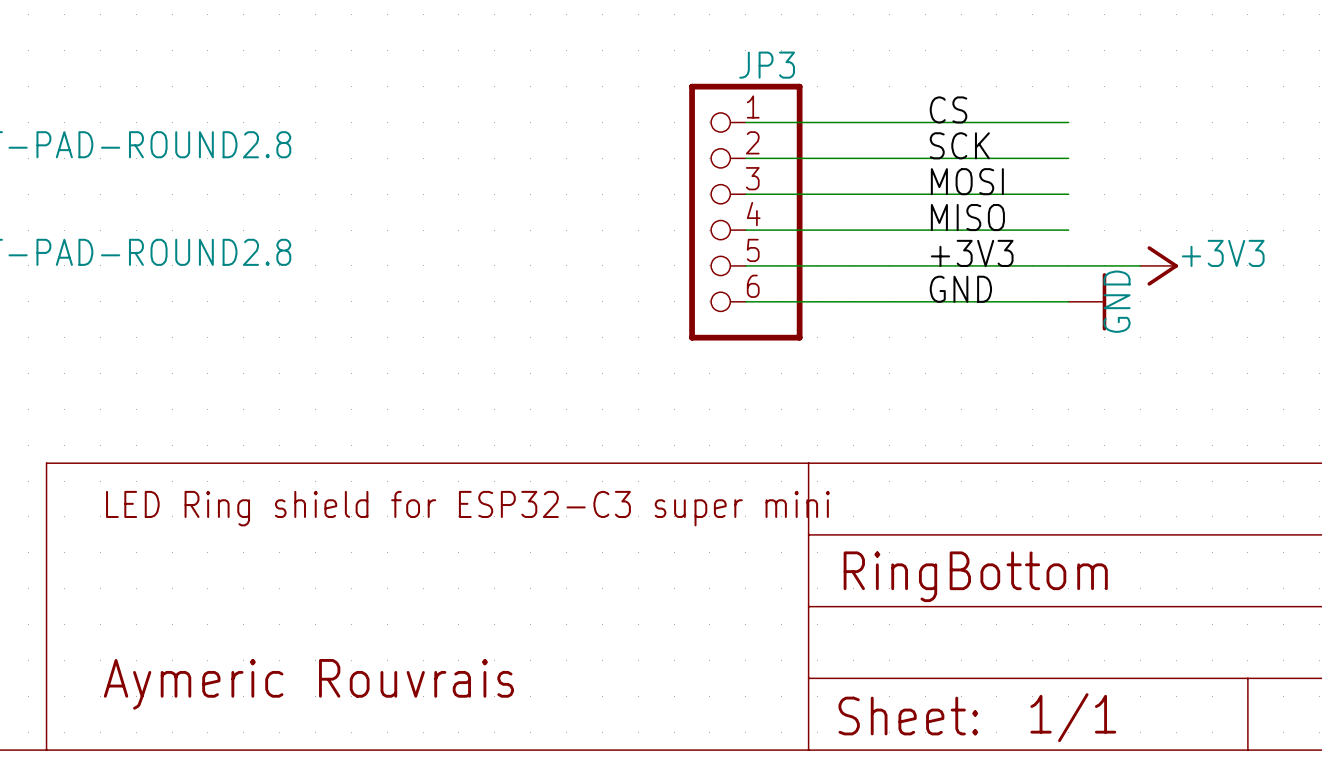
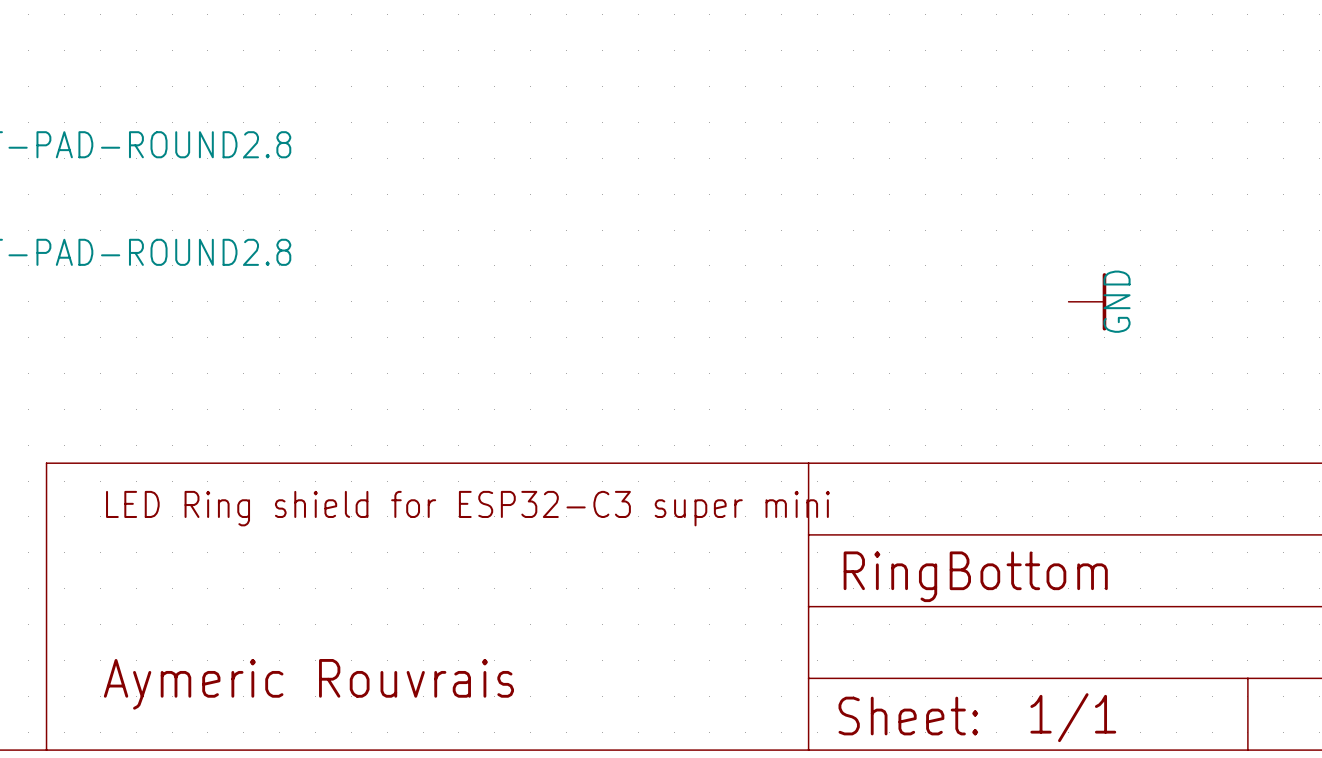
label: CS (948, 109) -> none
wire: (745, 122) (1068, 122) -> none
label: SCK (959, 145) -> none
wire: (745, 158) (1068, 158) -> none
label: MOSI (967, 181) -> none
wire: (745, 194) (1068, 194) -> none
JP3: (745, 212) -> none
label: MISO (967, 217) -> none
wire: (745, 230) (1068, 230) -> none
label: +3V3 (972, 253) -> none
wire: (745, 265) (1140, 265) -> none
power symbol: +3V3 (1159, 265) -> none
label: GND (960, 289) -> none
wire: (745, 301) (1068, 301) -> none

